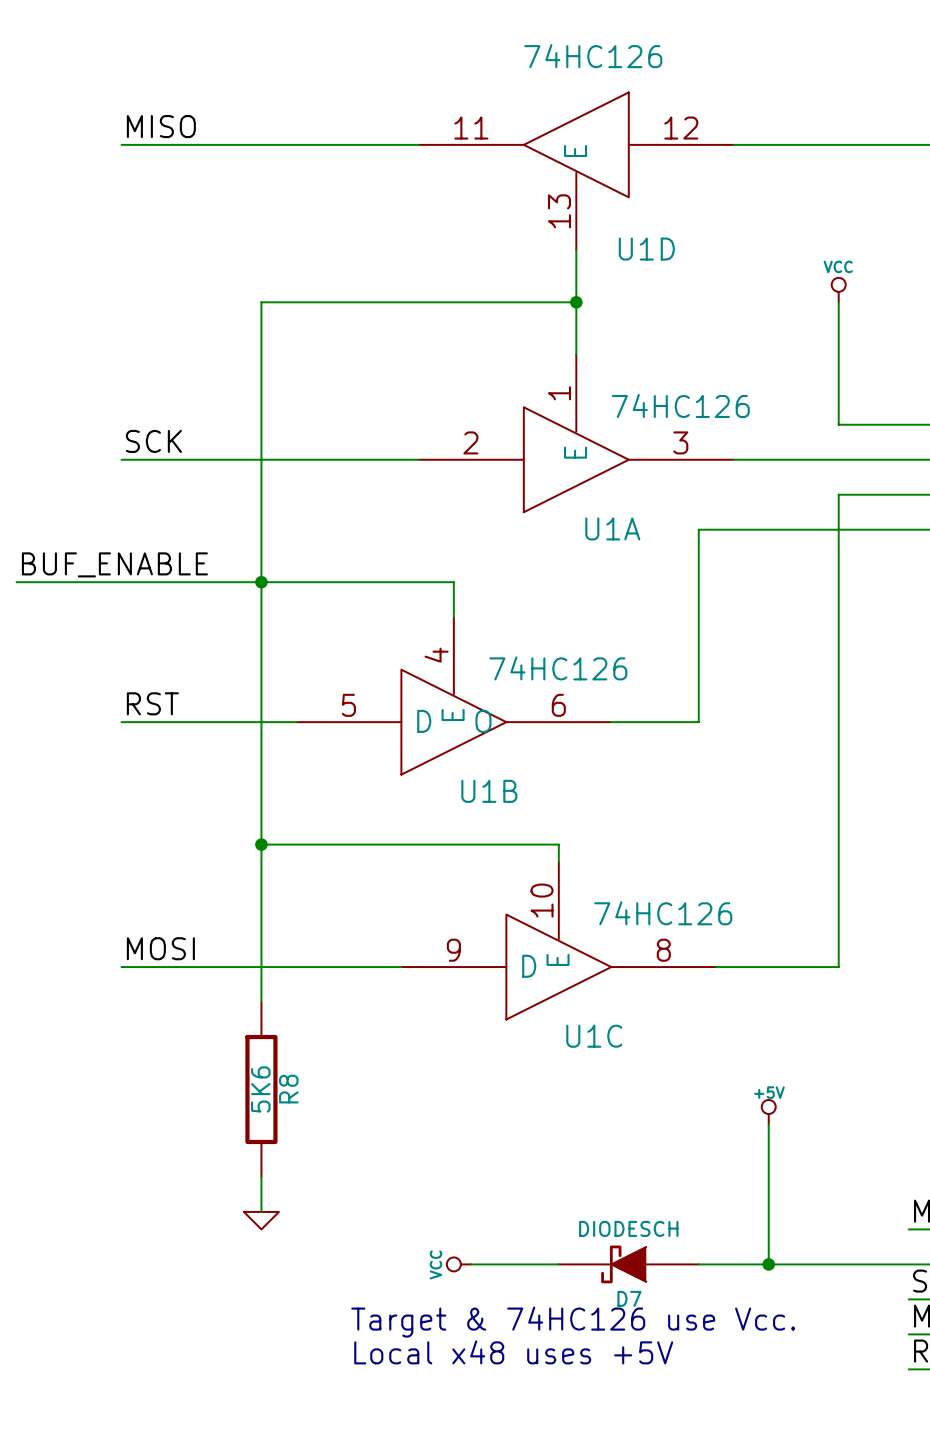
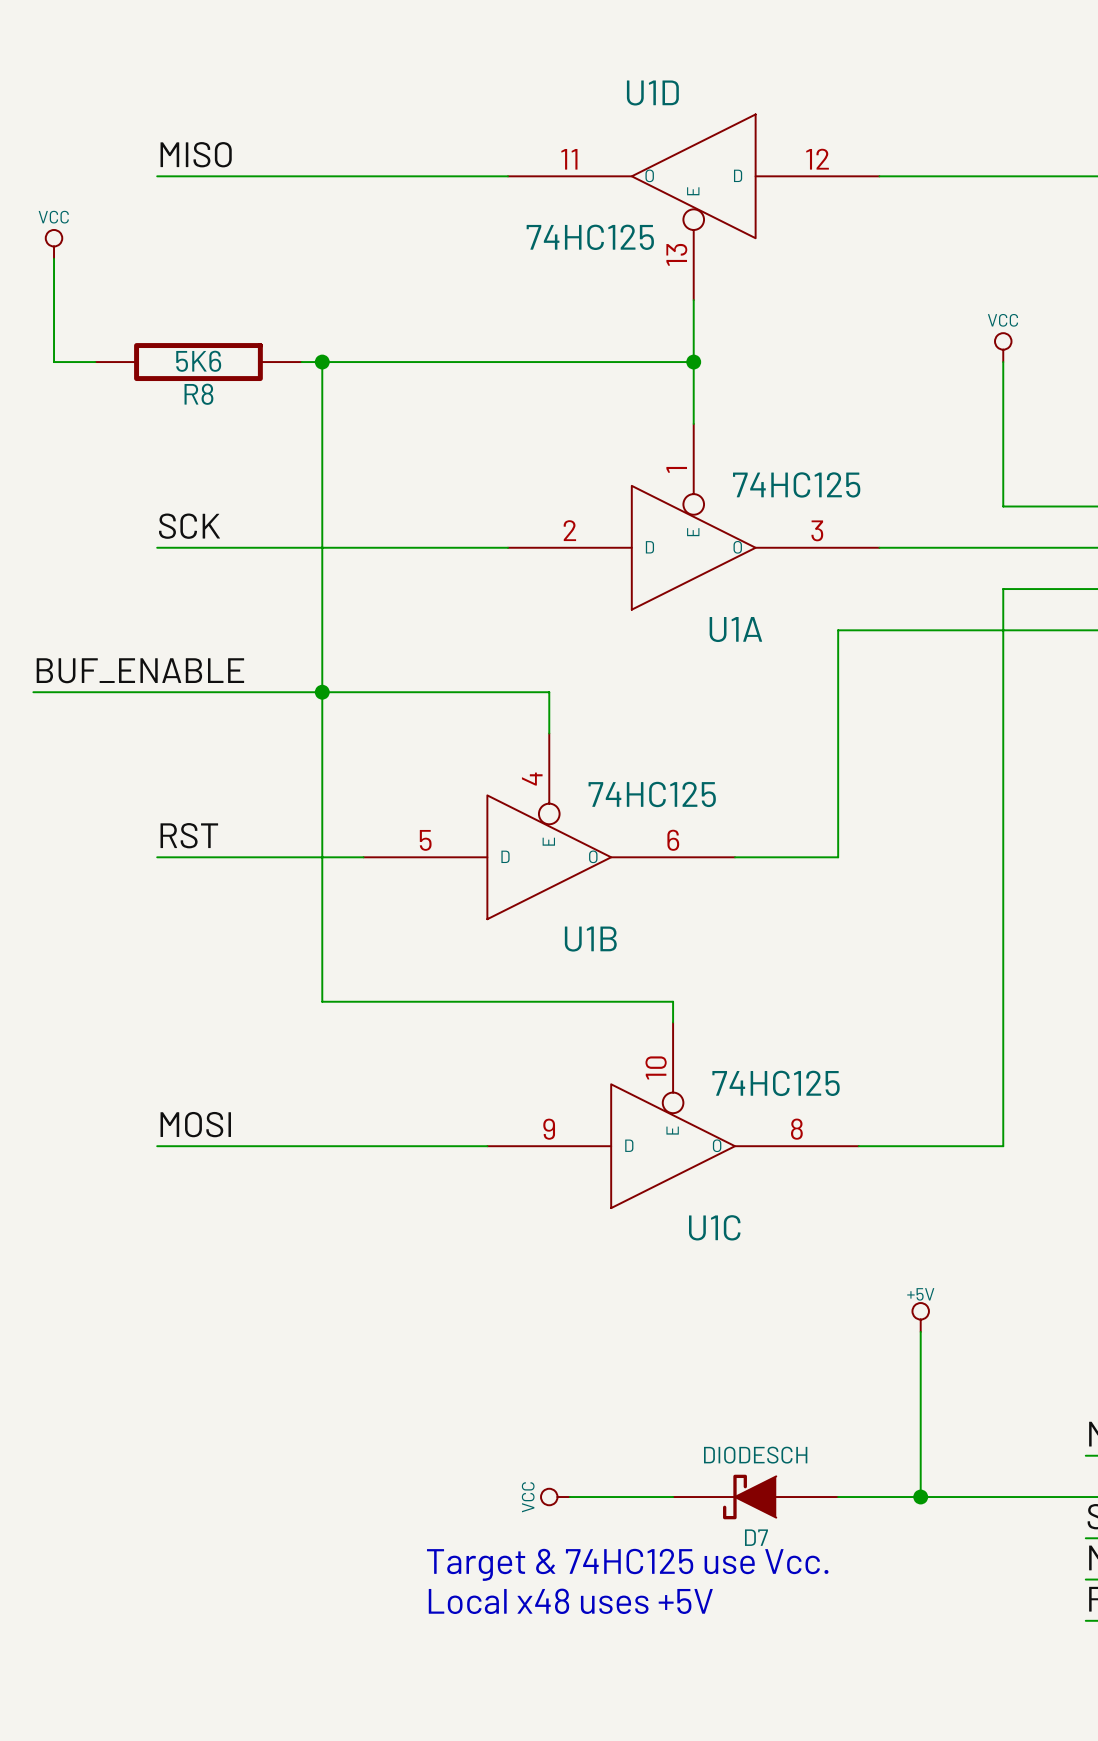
U1D value: 74HC126 (593, 56) -> 74HC125 (590, 237)
U1D symbol: [418, 92, 734, 250] -> [508, 114, 880, 301]
power symbol: none -> VCC (54, 244)
wire: none -> (54, 258) (54, 362) (95, 362)
U1D name position: U1D (646, 249) -> U1D (652, 92)
wire: none -> (301, 362) (322, 362)
junction: none -> (322, 362)
U1A symbol: [418, 354, 734, 513] -> [508, 423, 880, 610]
U1A value: 74HC126 (680, 405) -> 74HC125 (796, 484)
U1B symbol: [296, 617, 612, 775] -> [363, 733, 735, 920]
U1B value: 74HC126 (558, 668) -> 74HC125 (652, 794)
wire: (261, 844) (261, 1002) -> none
junction: (261, 844) -> none
U1C symbol: [401, 862, 717, 1020] -> [487, 1022, 859, 1209]
U1C value: 74HC126 (663, 913) -> 74HC125 (776, 1083)
R8 rotation: 0° (261, 1089) -> 90° clockwise (198, 362)
R8 position: (261, 1089) -> (198, 362)
wire: (261, 1176) (261, 1211) -> none
power symbol: (261, 1220) -> none
text: Target & 74HC126 use Vcc. (573, 1322) -> Target & 74HC125 use Vcc. (627, 1564)

